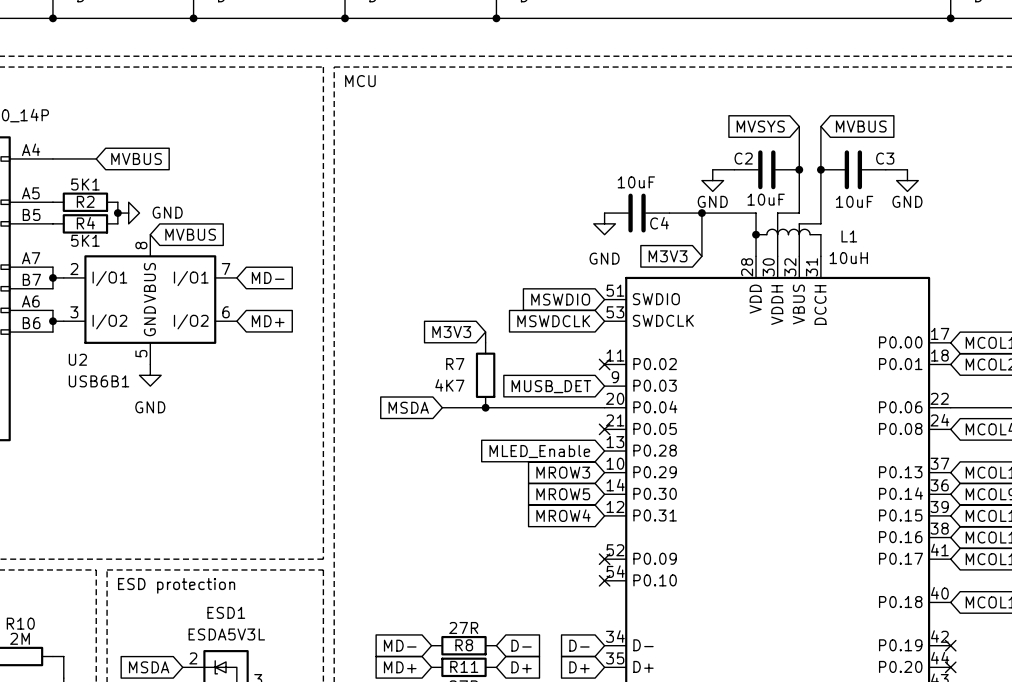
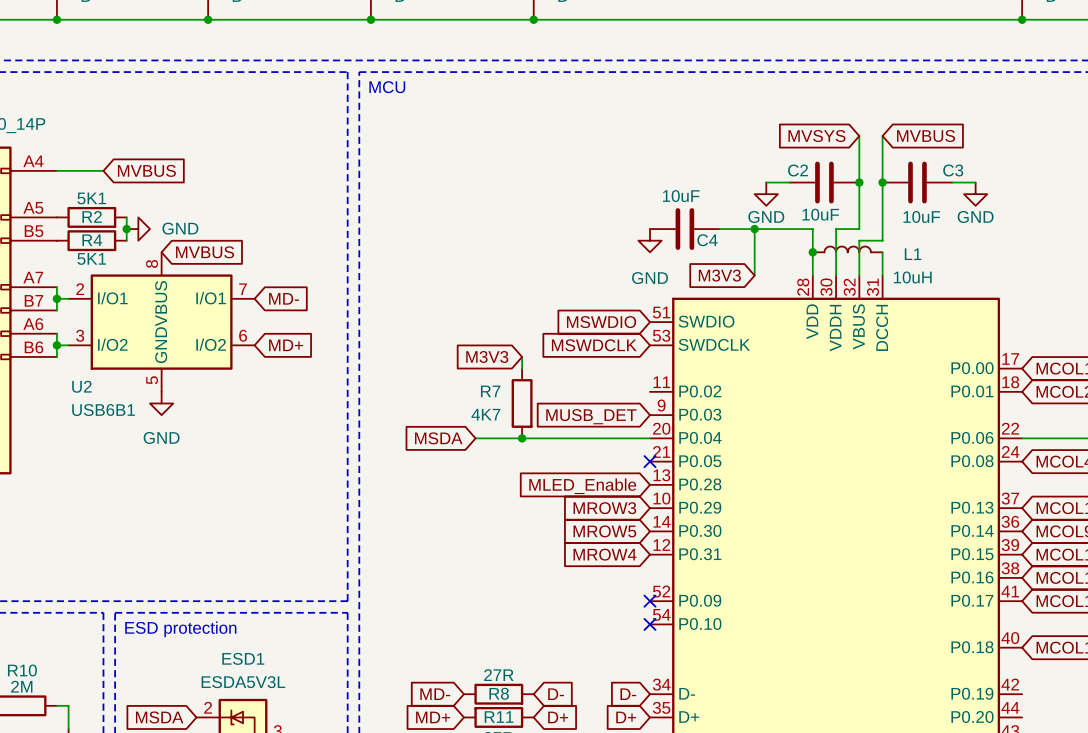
no-connect mark: (604, 364) -> none
no-connect mark: (950, 645) -> none
no-connect mark: (950, 667) -> none

